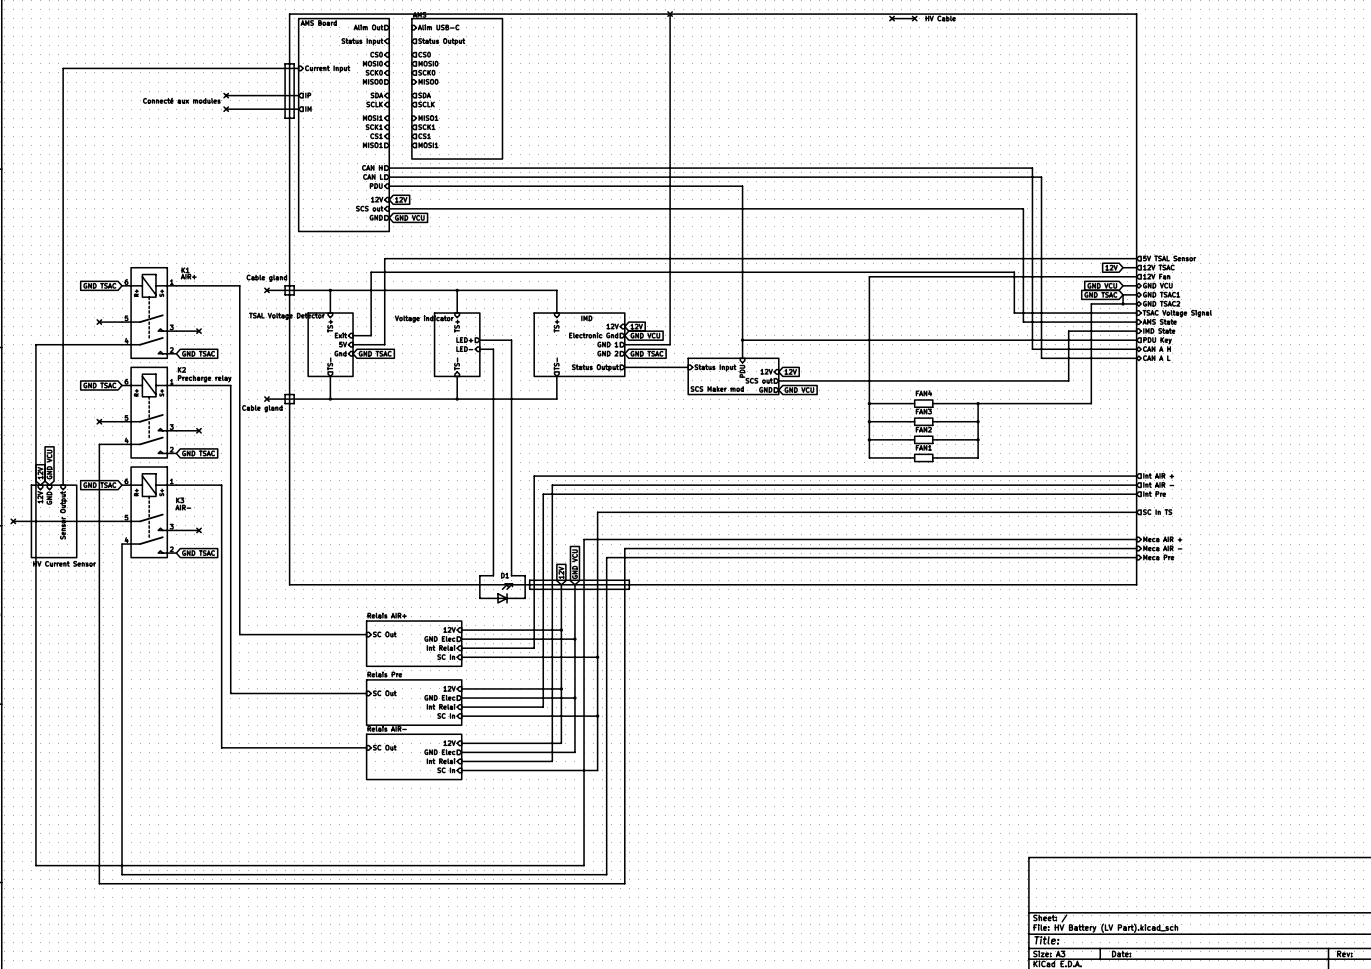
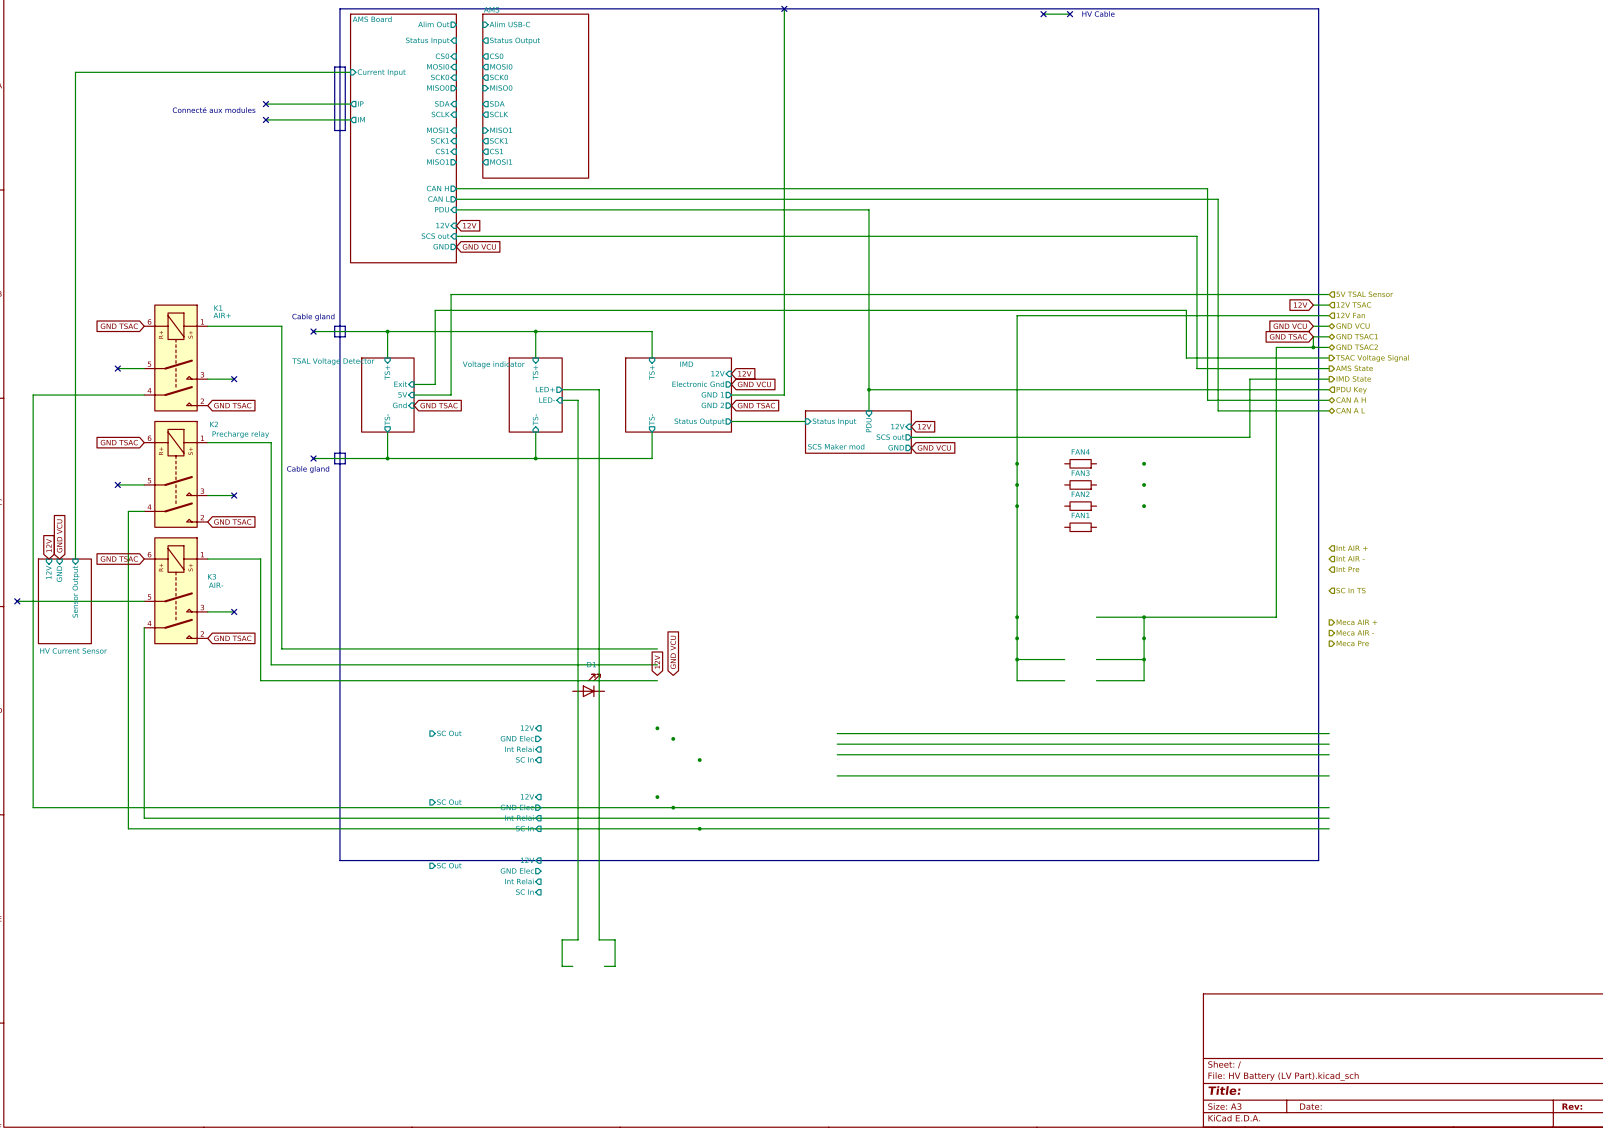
line: (1127, 14) (1136, 14) (1136, 584) (289, 584) -> (1318, 8) (1318, 860) (339, 860) (339, 675)
wire: (35, 344) (35, 865) (584, 865) (584, 539) (1136, 539) -> (43, 395) (33, 395) (33, 807) (541, 807)
wire: (869, 403) (910, 403) -> none
wire: (937, 403) (1091, 403) -> (1096, 617) (1276, 617) (1276, 463)
wire: (978, 403) (978, 457) (937, 457) -> none
wire: (869, 421) (910, 421) -> none
wire: (937, 421) (978, 421) -> none
wire: (869, 439) (910, 439) -> none
wire: (937, 439) (978, 439) -> none
wire: (108, 444) (99, 444) (99, 883) (624, 883) (624, 548) (1136, 548) -> (128, 511) (128, 828) (541, 828)
wire: (869, 457) (910, 457) -> (1017, 527) (1017, 680) (1064, 680)
wire: (1136, 476) (534, 476) (534, 648) (461, 648) -> none
wire: (1136, 485) (552, 485) (552, 761) (461, 761) -> none
wire: (1136, 494) (543, 494) (543, 707) -> (1329, 818) (636, 818)
wire: (1136, 512) (597, 512) (597, 770) (461, 770) -> none
junction: none -> (1017, 617)
wire: none -> (1144, 617) (1144, 680) (1096, 680)
junction: none -> (1144, 617)
junction: none -> (1017, 638)
junction: none -> (1144, 638)
wire: (1136, 557) (606, 557) (606, 874) (122, 874) (122, 707) -> (541, 818) (144, 818)
wire: (239, 562) (239, 634) (366, 634) -> (281, 648) (657, 648)
wire: none -> (1017, 659) (1064, 659)
junction: none -> (1017, 659)
wire: none -> (1096, 659) (1144, 659)
junction: none -> (1144, 659)
wire: (230, 575) (230, 693) (366, 693) -> (271, 664) (562, 664)
wire: (479, 575) (479, 598) (488, 598) -> none
wire: (525, 575) (525, 598) (516, 598) -> (615, 664) (657, 664)
line: (529, 580) (629, 580) (629, 589) (529, 589) (529, 580) -> none
wire: (561, 584) (561, 743) (461, 743) -> none
wire: (574, 584) (574, 752) (461, 752) -> none
wire: (221, 589) (221, 747) (366, 747) -> (260, 680) (657, 680)
wire: (461, 630) (561, 630) -> none
wire: none -> (837, 733) (1329, 733)
wire: (461, 639) (574, 639) -> none
sheet: (414, 643) -> none
wire: none -> (837, 744) (1329, 744)
wire: none -> (837, 754) (1329, 754)
wire: (461, 657) (597, 657) -> none
wire: none -> (837, 775) (1329, 775)
wire: (461, 688) (561, 688) -> none
wire: none -> (673, 807) (1329, 807)
sheet: (414, 702) -> none
wire: none -> (699, 828) (1329, 828)
sheet: (414, 756) -> none
wire: none -> (572, 966) (562, 966) (562, 939) (578, 939) (578, 664) (599, 664) (599, 939) (615, 939) (615, 966) (604, 966)

